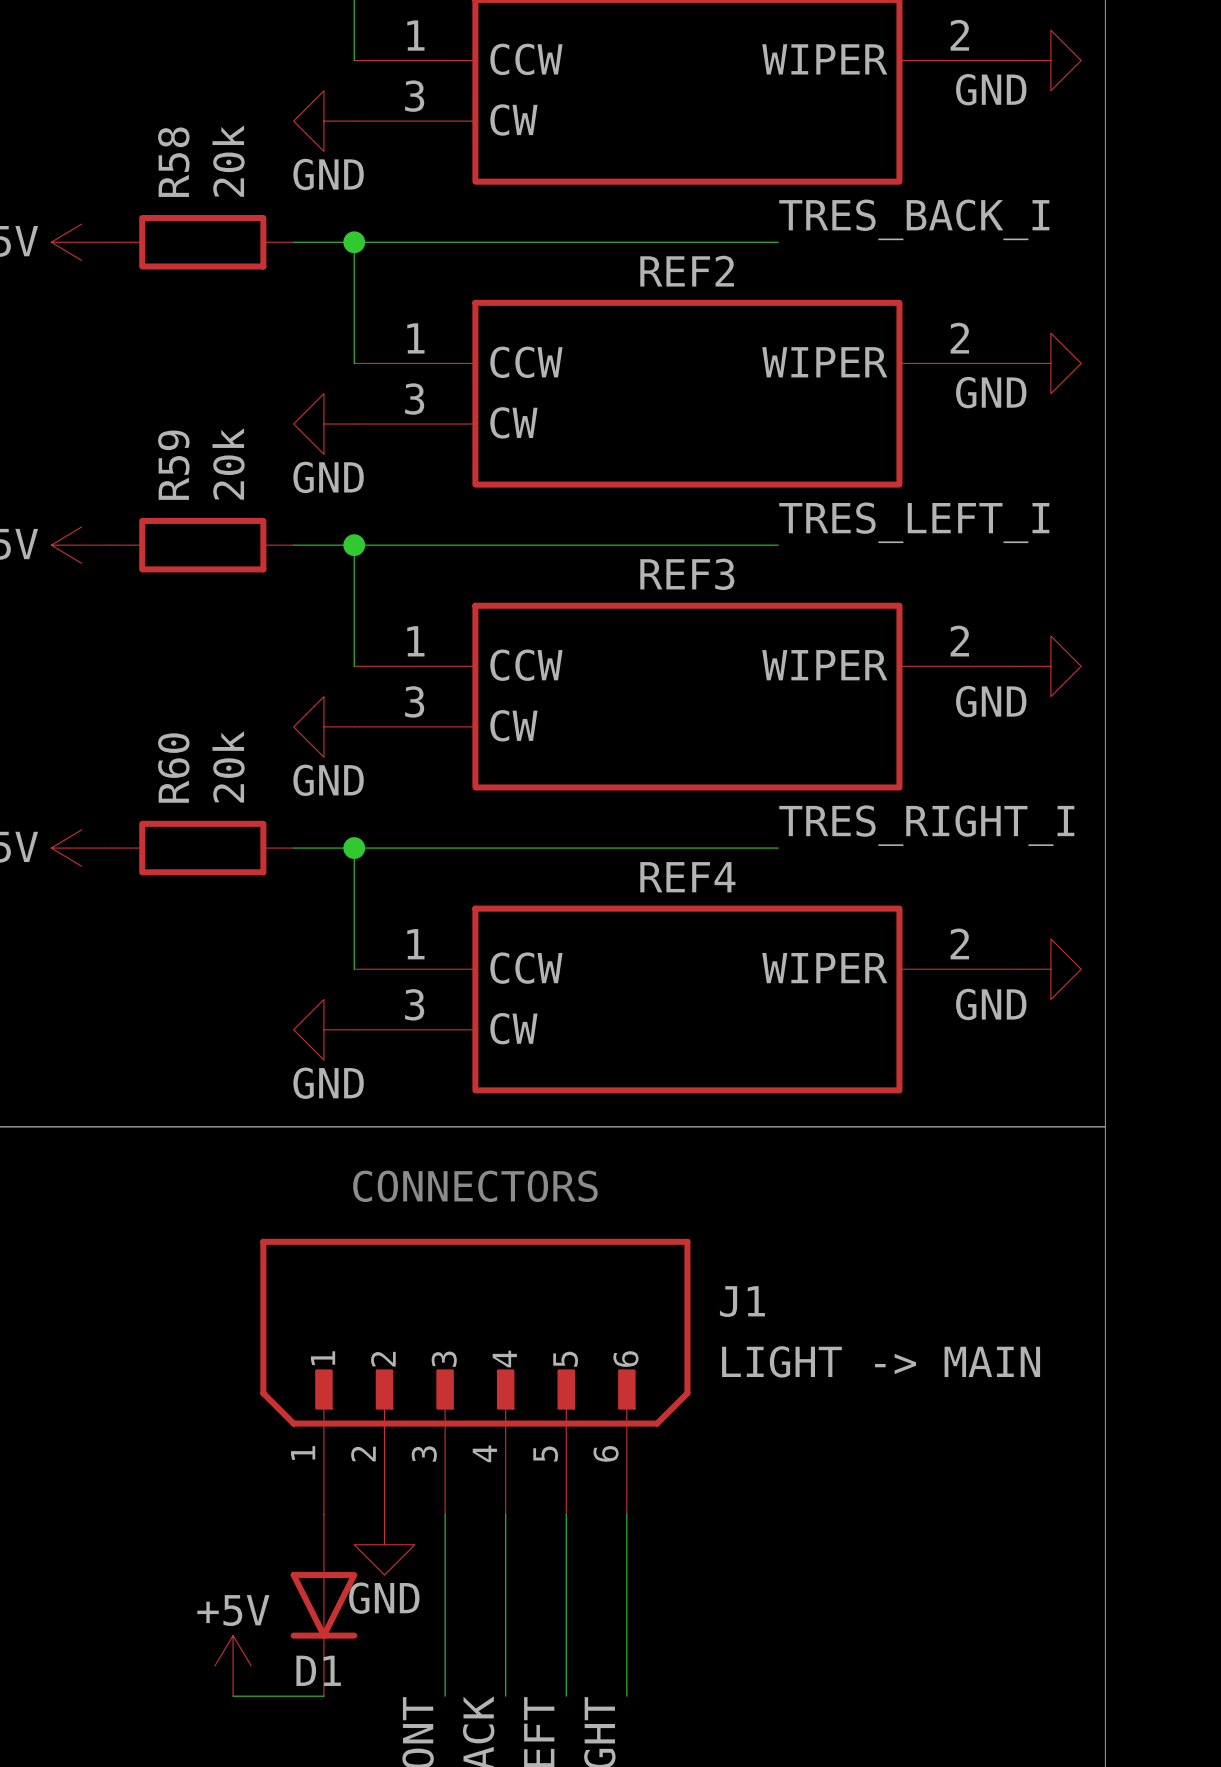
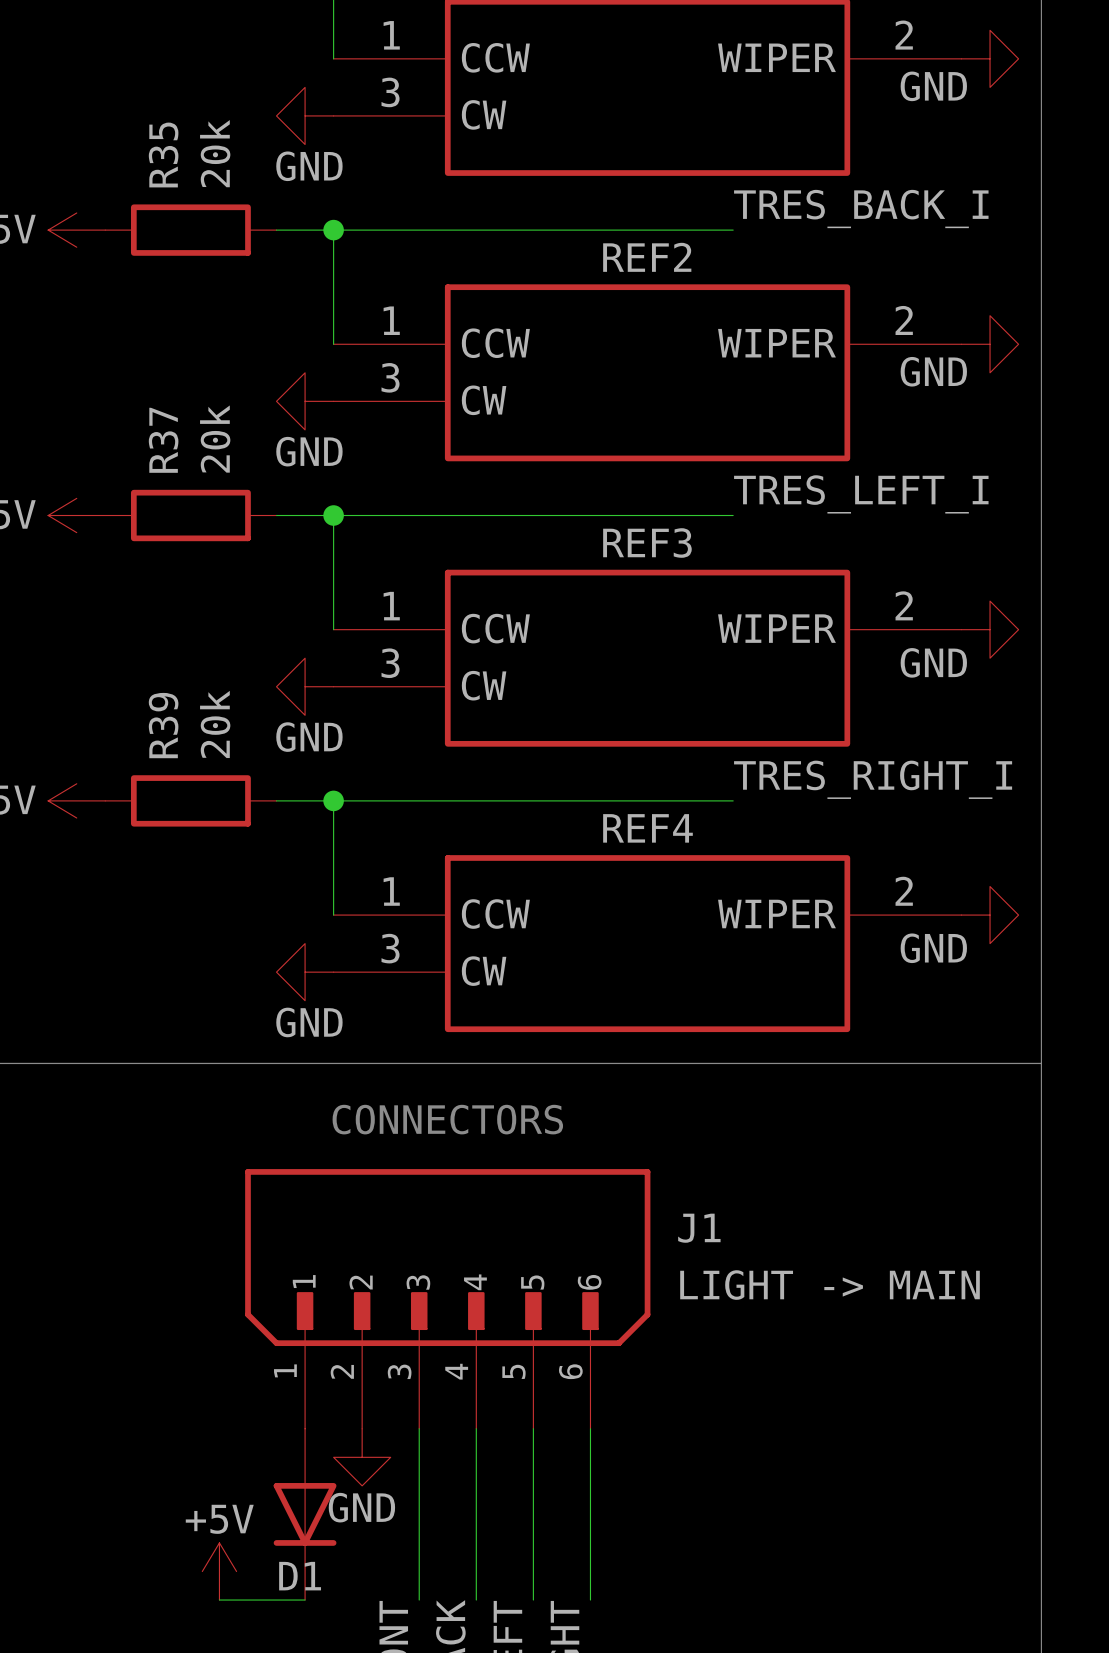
R58 name: R58 (173, 162) -> R35 (163, 154)
R59 name: R59 (173, 465) -> R37 (163, 440)
R60 name: R60 (173, 768) -> R39 (163, 725)

